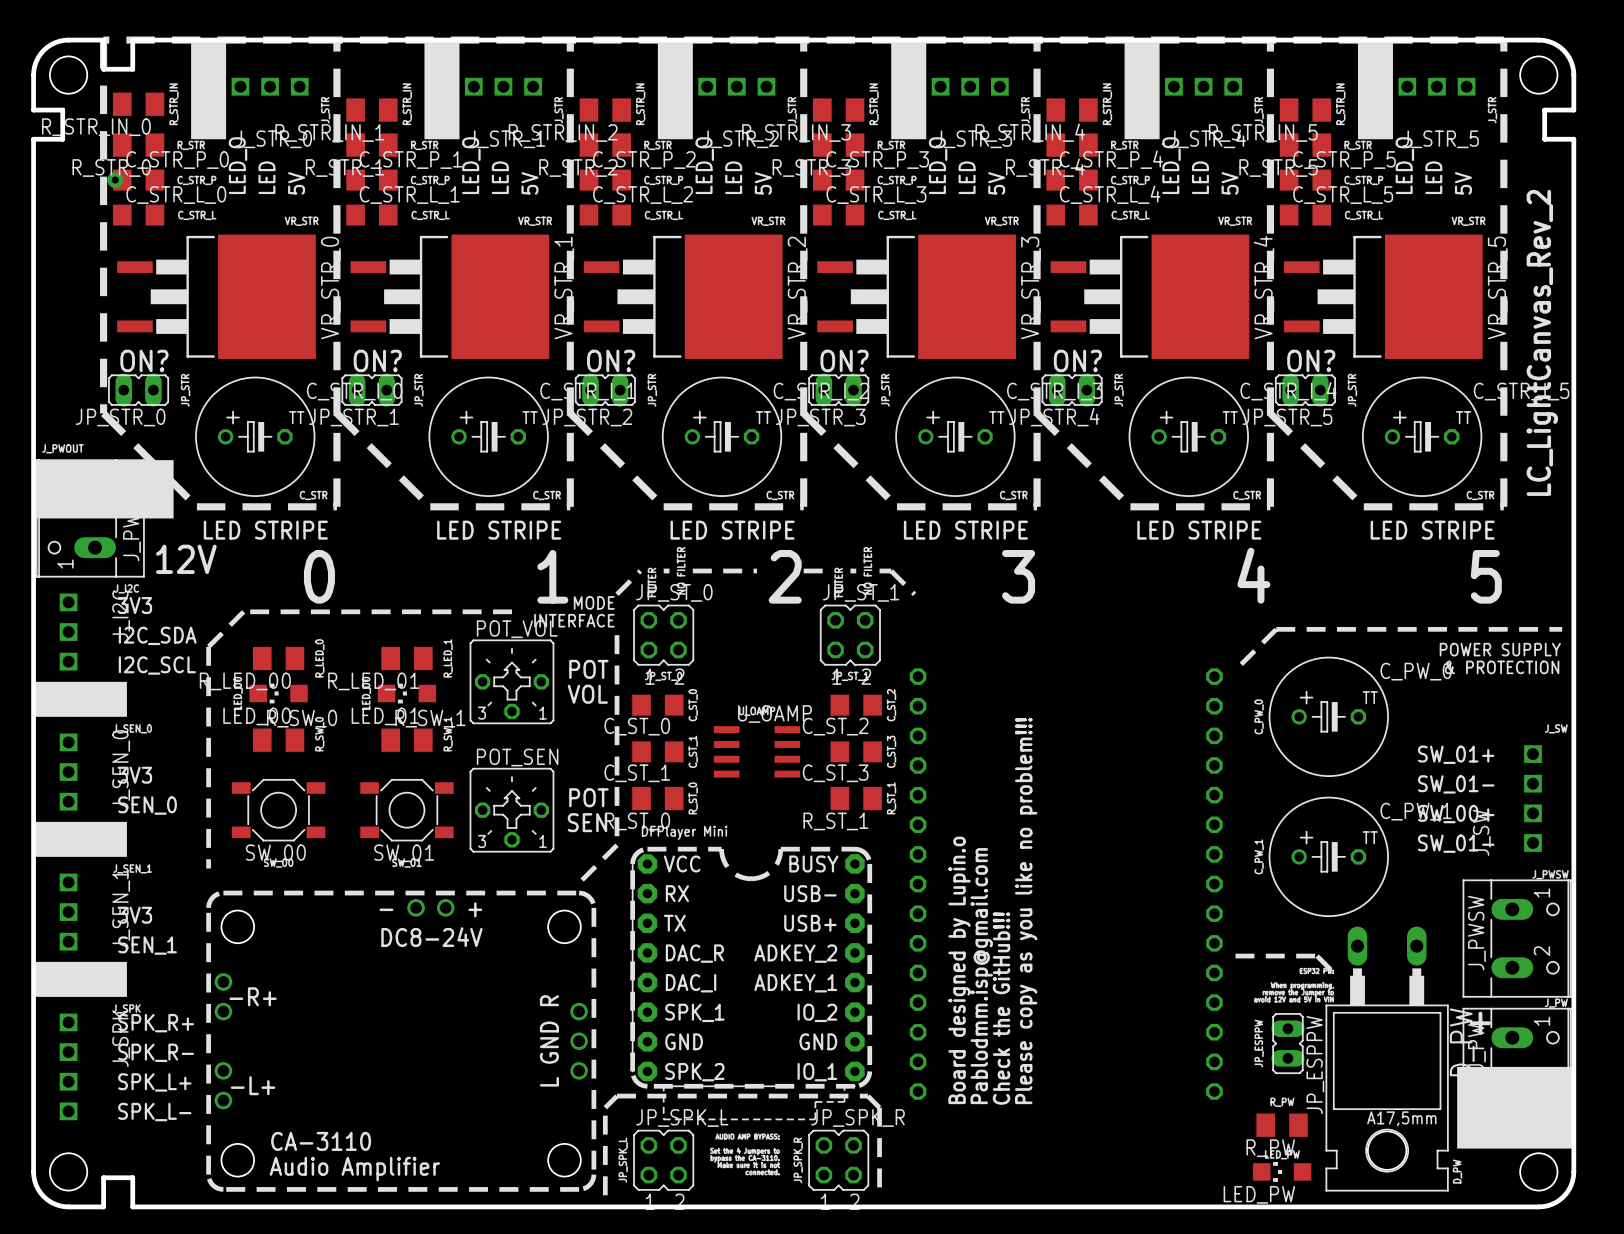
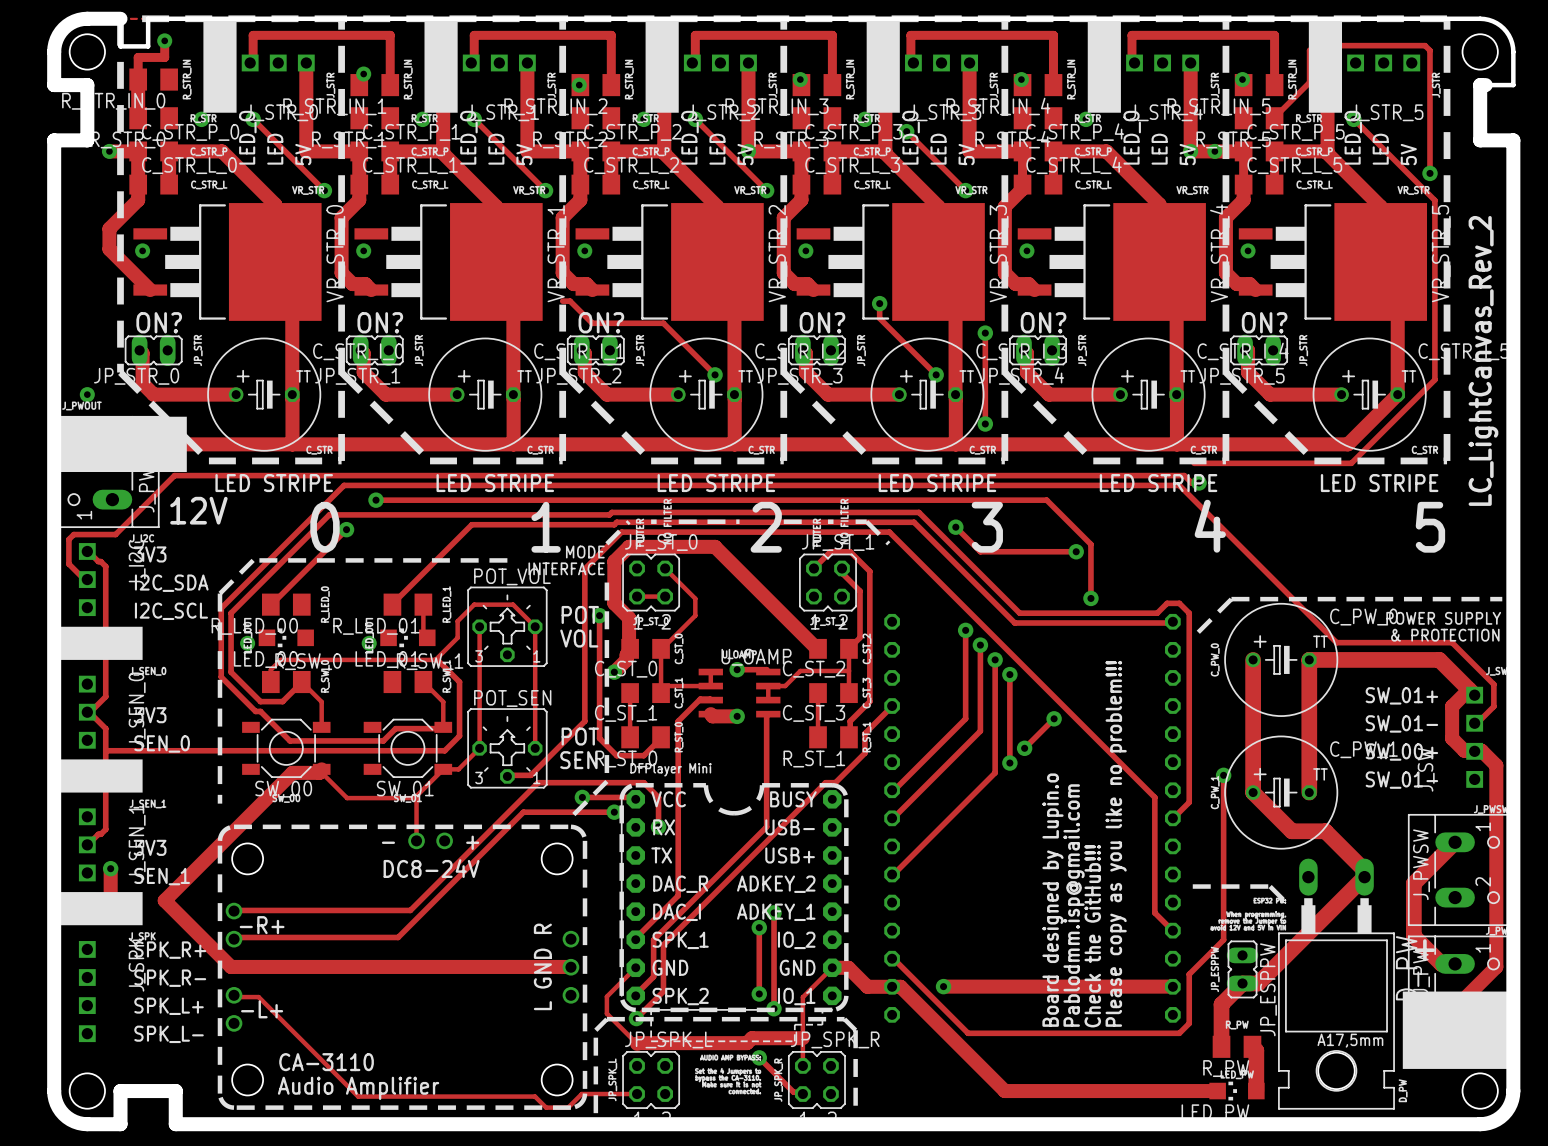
board edge width: thin (103, 40) (59, 41) (47, 47) (38, 57) (33, 70) (33, 110) (62, 110) -> thick (120, 18) (78, 19) (67, 25) (58, 35) (54, 47) (54, 85) (81, 85)
track: none -> (164, 40) (164, 57) (138, 57) (138, 118)
via: none -> (164, 40)
track: none -> (250, 62) (253, 62) (253, 35) (390, 35) (390, 85)
track: none -> (306, 62) (306, 151) (359, 151) (359, 200) (341, 217) (341, 273) (352, 284) (365, 284) (371, 290)
track: none -> (443, 62) (443, 151) (390, 151) (390, 184)
track: none -> (471, 62) (474, 62) (474, 35) (611, 35) (611, 85)
track: none -> (527, 62) (527, 151) (580, 151) (580, 200) (562, 217) (562, 273) (573, 284) (586, 284) (592, 290)
track: none -> (664, 62) (664, 151) (611, 151) (611, 184)
track: none -> (692, 62) (695, 62) (695, 35) (832, 35) (832, 85)
track: none -> (748, 62) (748, 151) (801, 151) (801, 200) (783, 217) (783, 273) (794, 284) (807, 284) (813, 290)
track: none -> (885, 62) (885, 151) (832, 151) (832, 184)
track: none -> (913, 62) (910, 62) (910, 35) (1053, 35) (1053, 85)
track: none -> (969, 62) (969, 151) (1022, 151) (1022, 189) (1004, 206) (1004, 273) (1015, 284) (1028, 284) (1034, 290)
track: none -> (1134, 62) (1131, 62) (1131, 35) (1274, 35) (1274, 85)
track: none -> (1190, 62) (1190, 151) (1243, 151) (1243, 200) (1225, 217) (1225, 273) (1236, 284) (1249, 284) (1255, 290)
track: none -> (1327, 62) (1327, 151) (1274, 151) (1274, 184)
via: none -> (363, 74)
via: none -> (800, 79)
via: none -> (1021, 79)
via: none -> (1242, 79)
board edge: (62, 110) (62, 139) (33, 139) (33, 168) -> (81, 85) (87, 85) (87, 140) (54, 140)
via: none -> (579, 85)
board edge: (1544, 110) (1544, 139) (1573, 139) (1573, 168) -> (1485, 85) (1480, 85) (1480, 140) (1513, 140)
track: none -> (1274, 118) (1309, 82) (1309, 50) (1314, 45) (1425, 45) (1430, 50) (1430, 173)
via: none -> (201, 119)
track: none -> (253, 119) (324, 190)
via: none -> (253, 119)
via: none -> (422, 119)
track: none -> (474, 119) (545, 190)
via: none -> (474, 119)
via: none -> (643, 119)
track: none -> (695, 119) (766, 190)
via: none -> (695, 119)
via: none -> (864, 119)
via: none -> (1086, 119)
track: none -> (1353, 119) (1434, 200) (1434, 379) (1351, 463) (1194, 463)
via: none -> (1353, 119)
track: none -> (906, 131) (965, 190)
via: none -> (906, 131)
board edge width: thin (33, 168) (33, 1176) (38, 1189) (47, 1199) (59, 1205) (68, 1206) (103, 1206) (103, 1177) -> thick (54, 140) (54, 1095) (58, 1107) (67, 1117) (78, 1123) (87, 1124) (120, 1124) (120, 1096)
board edge width: thin (1573, 168) (1573, 1171) (1569, 1189) (1560, 1199) (1547, 1205) (1538, 1206) (161, 1206) -> thick (1513, 140) (1513, 1091) (1508, 1107) (1500, 1117) (1488, 1123) (1480, 1124) (175, 1124)
track: none -> (109, 151) (138, 151) (138, 200) (109, 228) (109, 249) (150, 290)
via position: (115, 180) -> (109, 151)
track: none -> (441, 151) (496, 206) (496, 261) (513, 261) (513, 444)
track: none -> (662, 151) (717, 206) (717, 261) (734, 261) (734, 444)
via: none -> (748, 151)
track: none -> (883, 151) (938, 206) (938, 261) (955, 261) (955, 444)
via: none -> (1190, 151)
via: none -> (1214, 151)
track: none -> (1325, 151) (1380, 206) (1380, 261) (1397, 261) (1397, 394) (1347, 444) (112, 444)
via: none -> (1430, 173)
track: none -> (169, 184) (169, 151) (222, 151) (275, 204) (275, 261) (292, 261) (292, 444)
track: none -> (1053, 184) (1053, 151) (1106, 151) (1159, 204) (1159, 261) (1176, 261) (1176, 444)
via: none -> (324, 190)
via: none -> (545, 190)
via: none -> (766, 190)
via: none -> (965, 190)
via: none -> (142, 250)
via: none -> (363, 250)
via: none -> (584, 250)
via: none -> (805, 250)
via: none -> (1026, 250)
via: none -> (1248, 250)
track: none -> (562, 301) (570, 301) (592, 323) (663, 323) (715, 374)
track: none -> (879, 303) (879, 318) (936, 374)
via: none -> (879, 303)
text position: LC_LightCanvas_Rev_2 (1542, 342) -> LC_LightCanvas_Rev_2 (1483, 360)
track: none -> (985, 333) (985, 424)
via: none -> (985, 333)
track: none -> (139, 350) (142, 353) (142, 383) (153, 394) (236, 394)
track: none -> (360, 350) (363, 353) (363, 372) (385, 394) (457, 394)
track: none -> (581, 350) (584, 353) (584, 372) (606, 394) (678, 394)
track: none -> (802, 350) (805, 353) (805, 372) (827, 394) (899, 394)
track: none -> (1023, 350) (1026, 353) (1026, 372) (1049, 394) (1120, 394)
track: none -> (1245, 350) (1248, 350) (1248, 372) (1270, 394) (1341, 394)
via: none -> (715, 374)
via: none -> (936, 374)
via: none -> (87, 394)
via: none -> (985, 424)
track: none -> (1199, 482) (1191, 482) (1184, 475) (174, 475) (115, 534) (73, 534) (68, 539) (68, 564) (86, 581) (87, 579)
via: none -> (1199, 482)
track: none -> (376, 500) (1046, 500) (1090, 544) (1090, 598)
via: none -> (376, 500)
track: none -> (955, 527) (980, 551) (1076, 551)
via: none -> (955, 527)
track: none -> (346, 529) (270, 604)
via: none -> (346, 529)
track: none -> (87, 551) (105, 566) (105, 696) (91, 711) (87, 712) (105, 728) (105, 829) (87, 844)
via: none -> (1076, 551)
track: none -> (665, 568) (695, 598) (695, 615) (661, 648) (661, 693) (668, 686) (710, 686) (710, 672)
track: none -> (813, 568) (830, 551) (850, 551) (869, 571) (869, 701) (850, 721) (848, 737)
track: none -> (842, 568) (842, 573) (860, 591) (860, 637) (848, 648) (848, 693)
line: (1562, 629) (1276, 629) (1241, 664) -> (1502, 599) (1231, 599) (1198, 632)
track: none -> (637, 596) (665, 596)
text position: POWER SUPPLY (1500, 649) -> POWER SUPPLY (1443, 618)
via: none -> (1090, 598)
track: none -> (391, 604) (471, 524) (614, 524) (616, 522) (914, 522) (1014, 623) (1172, 621)
track: none -> (423, 604) (423, 633) (427, 637)
text position: & PROTECTION (1502, 667) -> & PROTECTION (1445, 635)
track: none -> (599, 615) (599, 738) (616, 755) (643, 755) (661, 737)
via: none -> (599, 615)
track: none -> (479, 626) (479, 748) (458, 769) (443, 769) (416, 796) (416, 840)
track: none -> (965, 630) (965, 718) (892, 790)
via: none -> (965, 630)
via: none -> (247, 643)
via: none -> (369, 643)
track: none -> (980, 645) (980, 731) (892, 818)
via: none -> (980, 645)
track: none -> (818, 648) (715, 546) (629, 546) (614, 561) (614, 603) (629, 618) (630, 648) (626, 659) (614, 672)
track: none -> (435, 659) (457, 637) (457, 621) (474, 604) (513, 604) (535, 626) (535, 748)
track: none -> (435, 659) (280, 659) (270, 669) (270, 682)
track: none -> (435, 659) (459, 681) (459, 736) (444, 750) (105, 750)
track: none -> (995, 659) (995, 772) (892, 874)
via: none -> (995, 659)
track: none -> (1253, 659) (1253, 792) (1291, 831) (1325, 831) (1364, 870) (1364, 877) (1258, 983) (1242, 983) (1221, 1004) (1221, 1046)
track: none -> (737, 669) (766, 669) (768, 672)
via: none -> (737, 669)
track: none -> (848, 670) (800, 670) (785, 686) (768, 686) (768, 700)
via: none -> (614, 672)
track: none -> (1009, 674) (1009, 763)
via: none -> (1009, 674)
track: none -> (423, 682) (443, 701) (442, 728) (395, 728) (383, 740) (290, 740) (260, 711) (255, 711) (221, 677) (221, 608) (344, 485) (1179, 485) (1336, 642) (1452, 642) (1493, 684) (1493, 706) (1476, 723) (1474, 723)
track: none -> (1469, 689) (1452, 706) (1452, 738) (1464, 750) (1481, 750) (1496, 765) (1496, 966) (1457, 1006) (1457, 1018) (1455, 1019)
track: none -> (630, 693) (630, 737)
track: none -> (818, 693) (818, 737)
track: none -> (1474, 695) (1439, 659) (1309, 659) (1309, 792)
track: none -> (710, 700) (700, 699) (678, 721) (678, 895) (635, 939)
track: none -> (892, 706) (864, 733) (864, 753) (835, 782) (825, 782) (663, 944) (663, 991) (636, 1018)
track: none -> (710, 714) (712, 716) (737, 716)
track: none -> (768, 714) (766, 716) (766, 826) (653, 939) (653, 976) (635, 995)
via: none -> (737, 716)
track: none -> (1054, 718) (1024, 748)
via: none -> (1054, 718)
track: none -> (321, 727) (321, 701) (301, 682) (282, 701) (260, 701) (231, 672) (231, 613) (329, 514) (918, 512) (1019, 613) (1157, 613) (1167, 603) (1179, 603) (1189, 613) (1189, 802) (1172, 818)
via: none -> (1024, 748)
via: none -> (1009, 763)
track: none -> (1223, 775) (1223, 939) (1189, 974) (1189, 1023) (1179, 1033) (968, 1033) (892, 958)
via: none -> (1223, 775)
track: none -> (507, 776) (530, 775) (584, 721) (584, 568) (621, 532) (889, 532) (1154, 797) (1154, 912) (1172, 930)
track: none -> (416, 798) (347, 798) (321, 772) (321, 769) (319, 772) (292, 772) (164, 900) (231, 966) (570, 967)
track: none -> (582, 797) (633, 797) (635, 799)
via: none -> (582, 797)
track: none -> (614, 812) (523, 812) (398, 937) (235, 937) (234, 939)
via: none -> (614, 812)
track: none -> (658, 826) (658, 797) (643, 782) (538, 782) (410, 910) (234, 911)
via: none -> (658, 826)
track: none -> (1455, 842) (1413, 883) (1413, 936) (1441, 963) (1455, 963)
text position: Please copy as you like no problem!!! (1026, 911) -> Please copy as you like no problem!!! (1116, 843)
track: none -> (110, 868) (110, 900)
via: none -> (110, 868)
text position: Board designed by Lupin.o (959, 970) -> Board designed by Lupin.o (1052, 900)
text position: Pablodmm.isp@gmail.com (981, 976) -> Pablodmm.isp@gmail.com (1074, 905)
track: none -> (774, 912) (774, 1008)
via: none -> (774, 912)
track: none -> (759, 927) (759, 993)
via: none -> (759, 927)
text position: Check the GitHub!!! (1001, 1008) -> Check the GitHub!!! (1092, 936)
track: none -> (635, 967) (606, 996) (606, 1013) (637, 1043) (747, 1043) (751, 1038) (802, 1038)
track: none -> (943, 986) (1172, 986)
via: none -> (943, 986)
via: none -> (759, 993)
track: none -> (234, 995) (235, 997) (258, 997) (358, 1096) (535, 1096) (546, 1107) (568, 1107) (581, 1094) (637, 1094)
via: none -> (774, 1008)
via: none -> (636, 1018)
track: none -> (1252, 1046) (1256, 1050) (1256, 1091)
track: none -> (759, 1057) (793, 1092) (802, 1094)
via: none -> (759, 1057)
track: none -> (802, 1065) (802, 997) (832, 967) (848, 967) (867, 986) (900, 986) (1004, 1091) (1217, 1091)
board edge: (103, 1177) (132, 1177) (132, 1206) (161, 1206) -> (120, 1096) (120, 1091) (175, 1091) (175, 1124)

